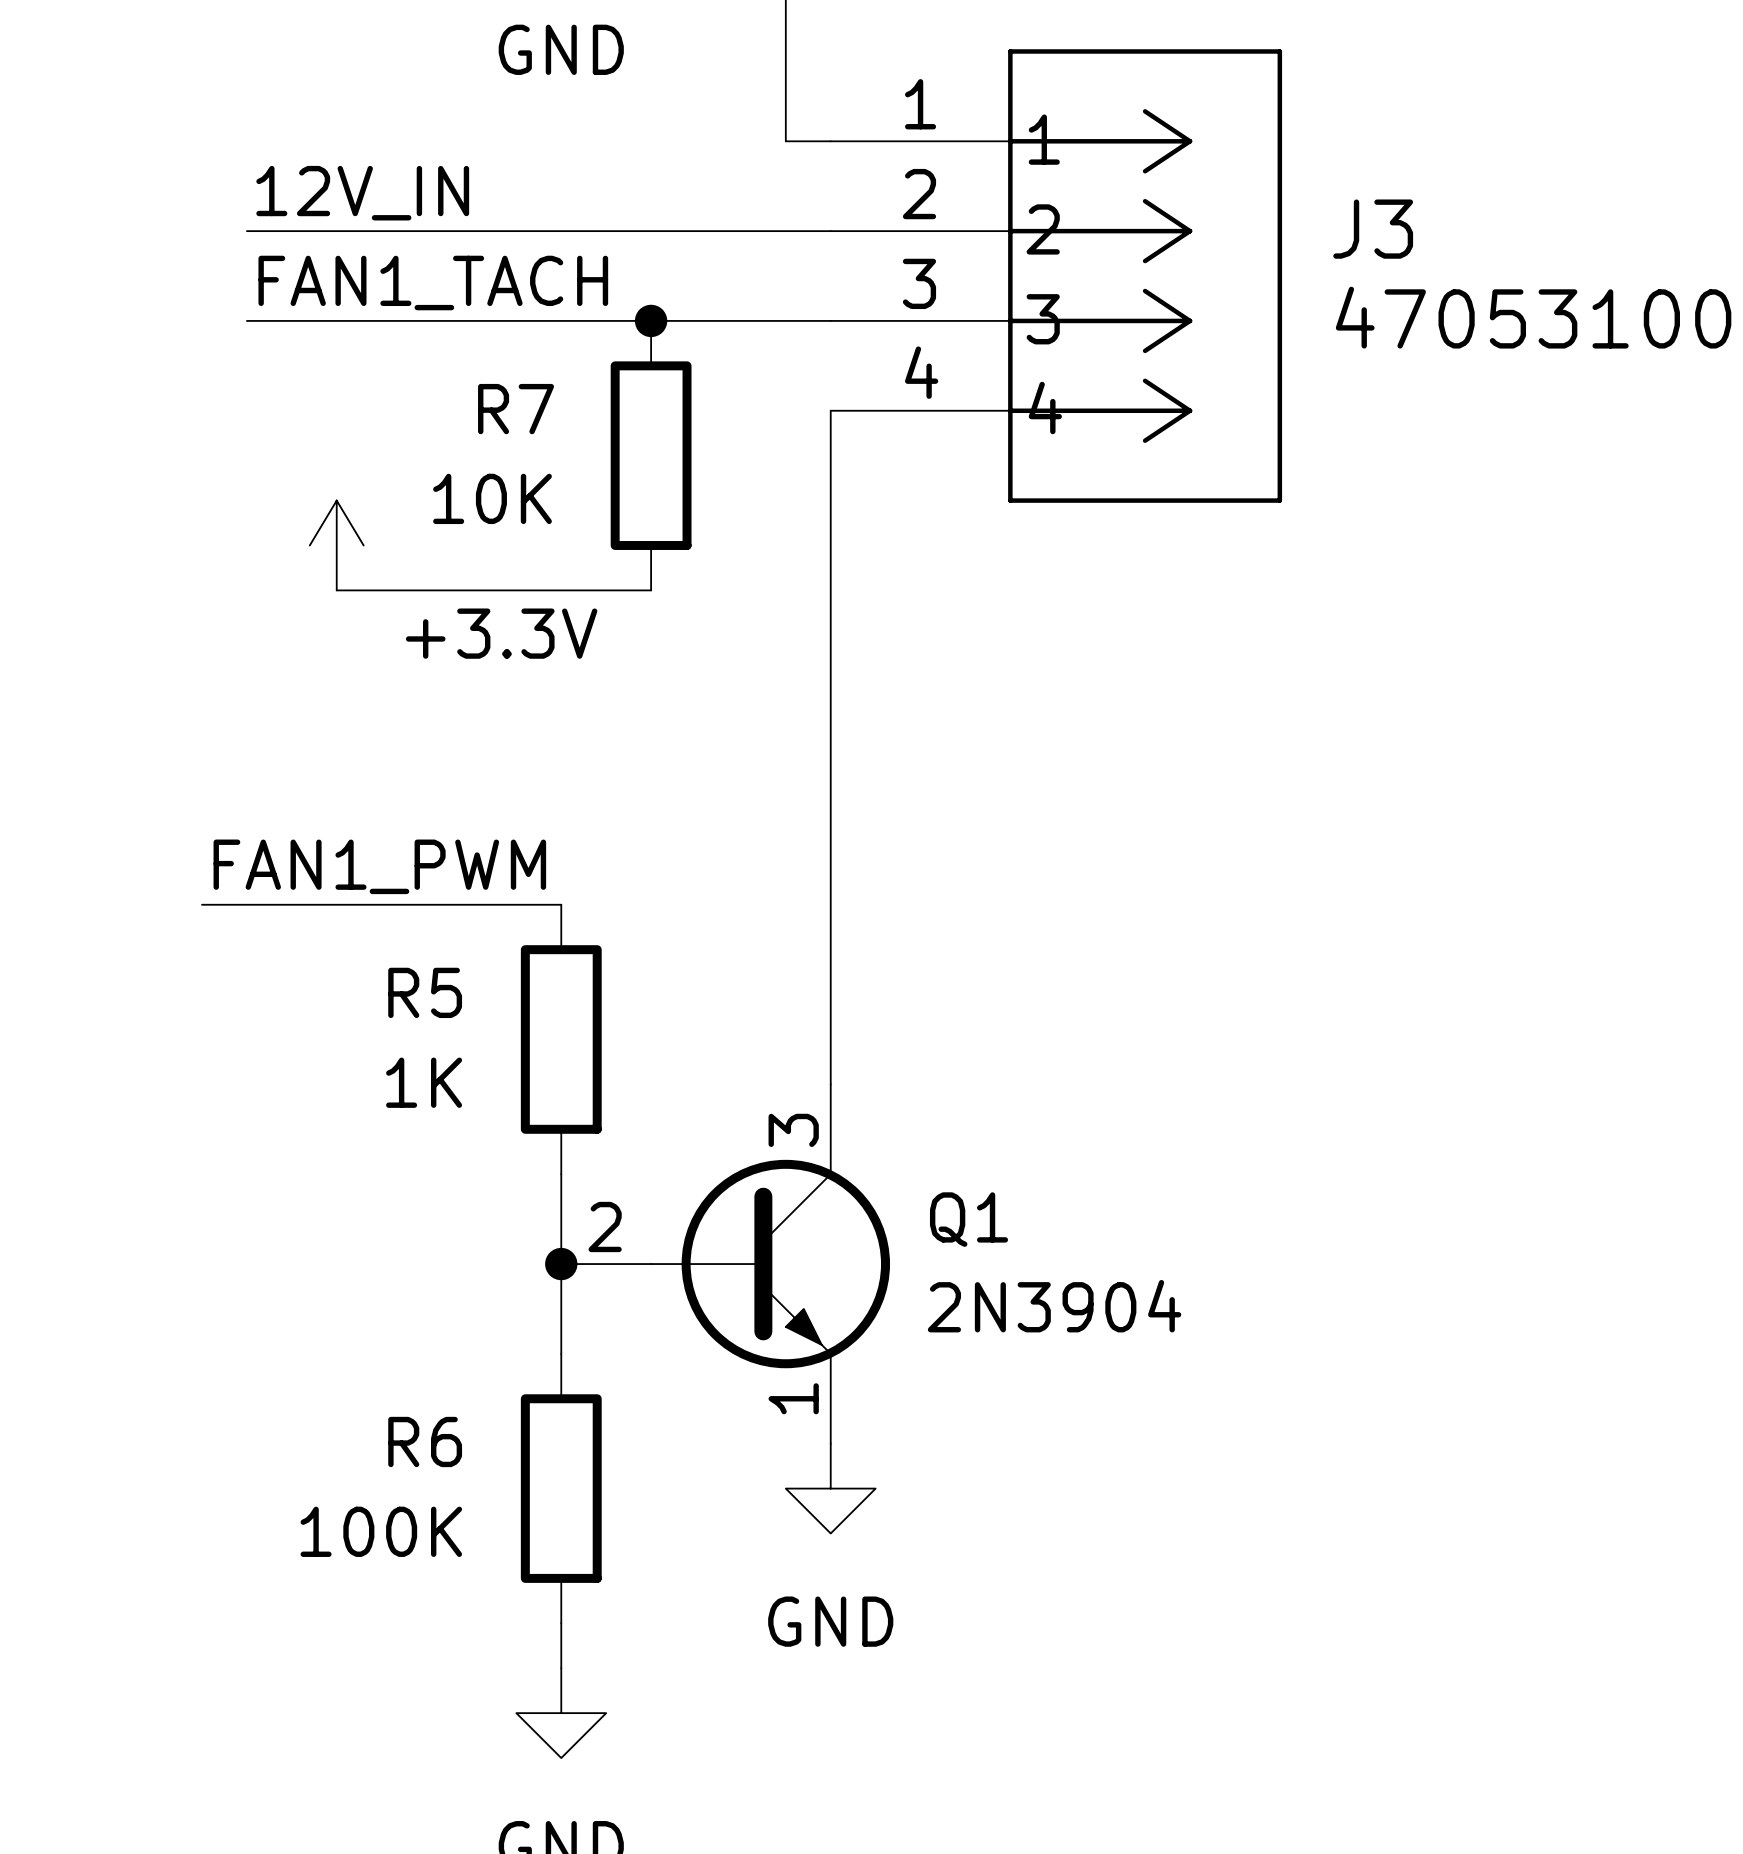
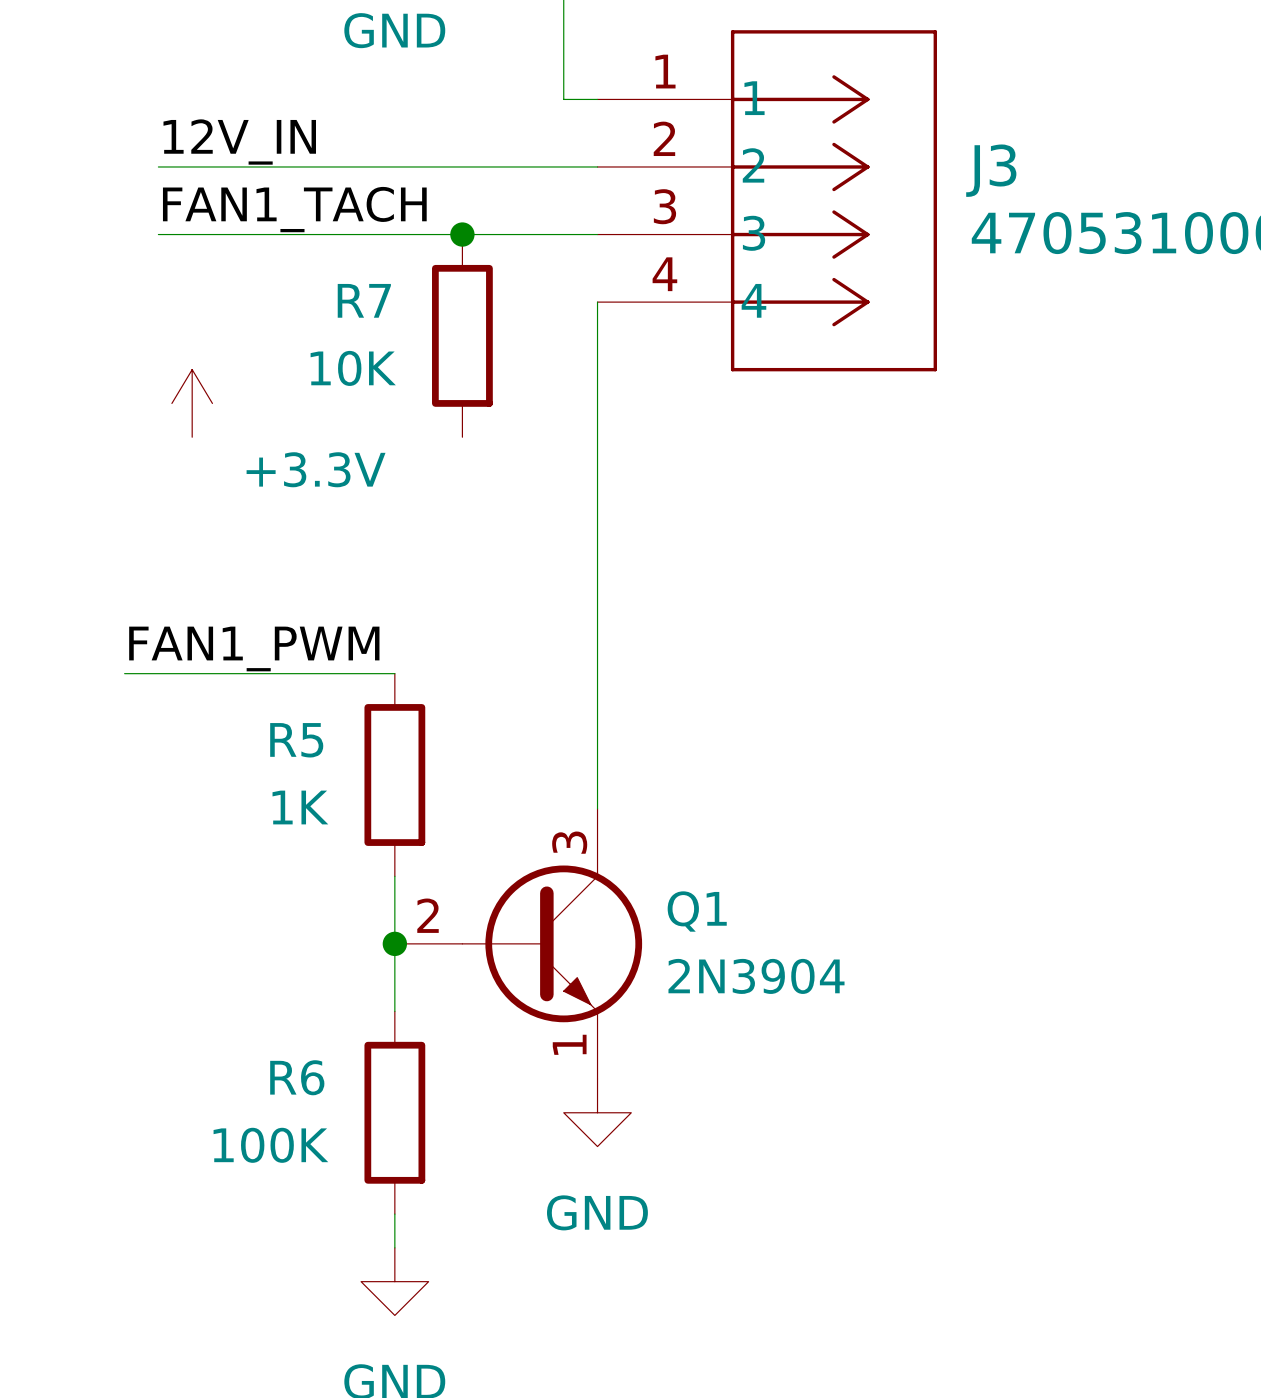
power symbol position: +3.3V (336, 545) -> +3.3V (192, 403)
wire: (336, 590) (651, 590) -> none

